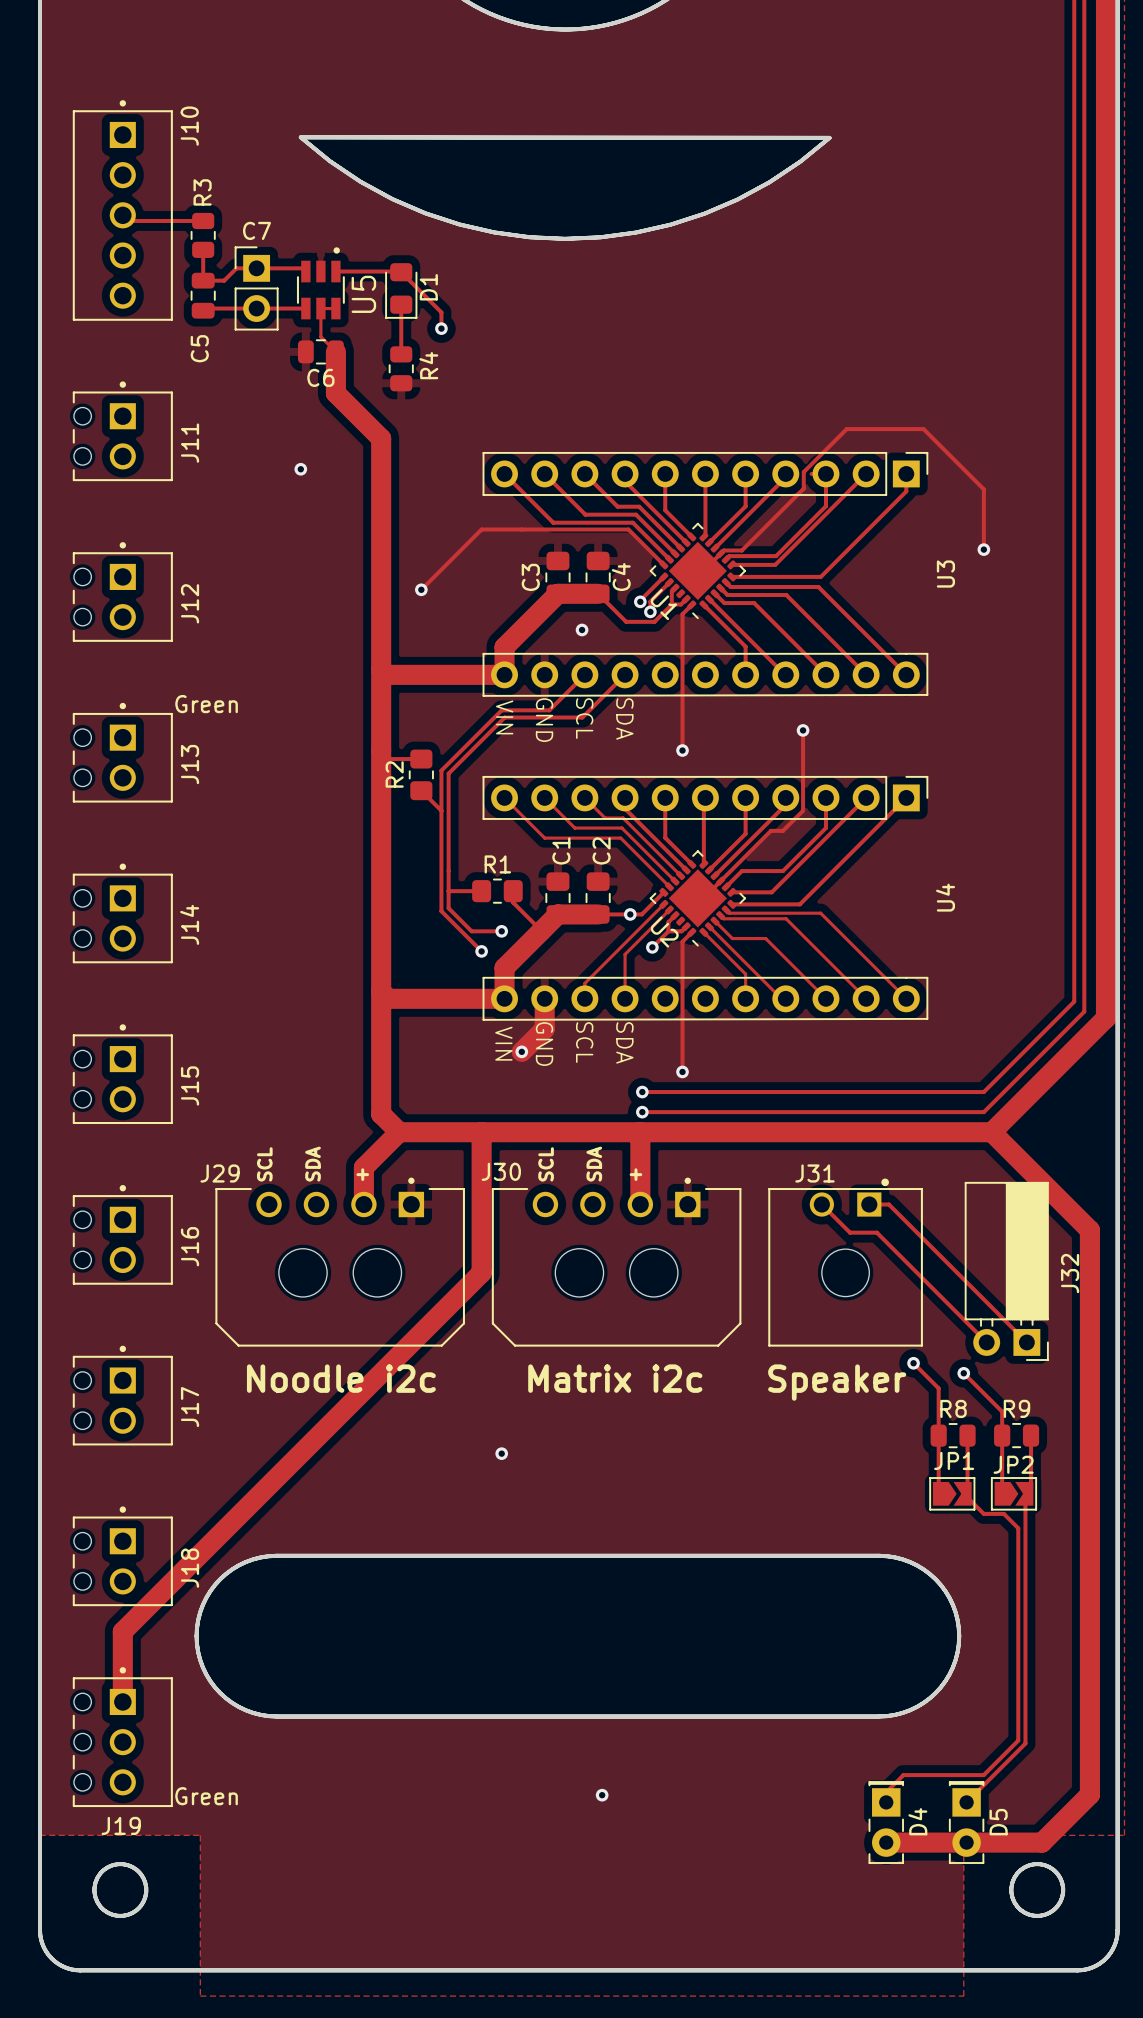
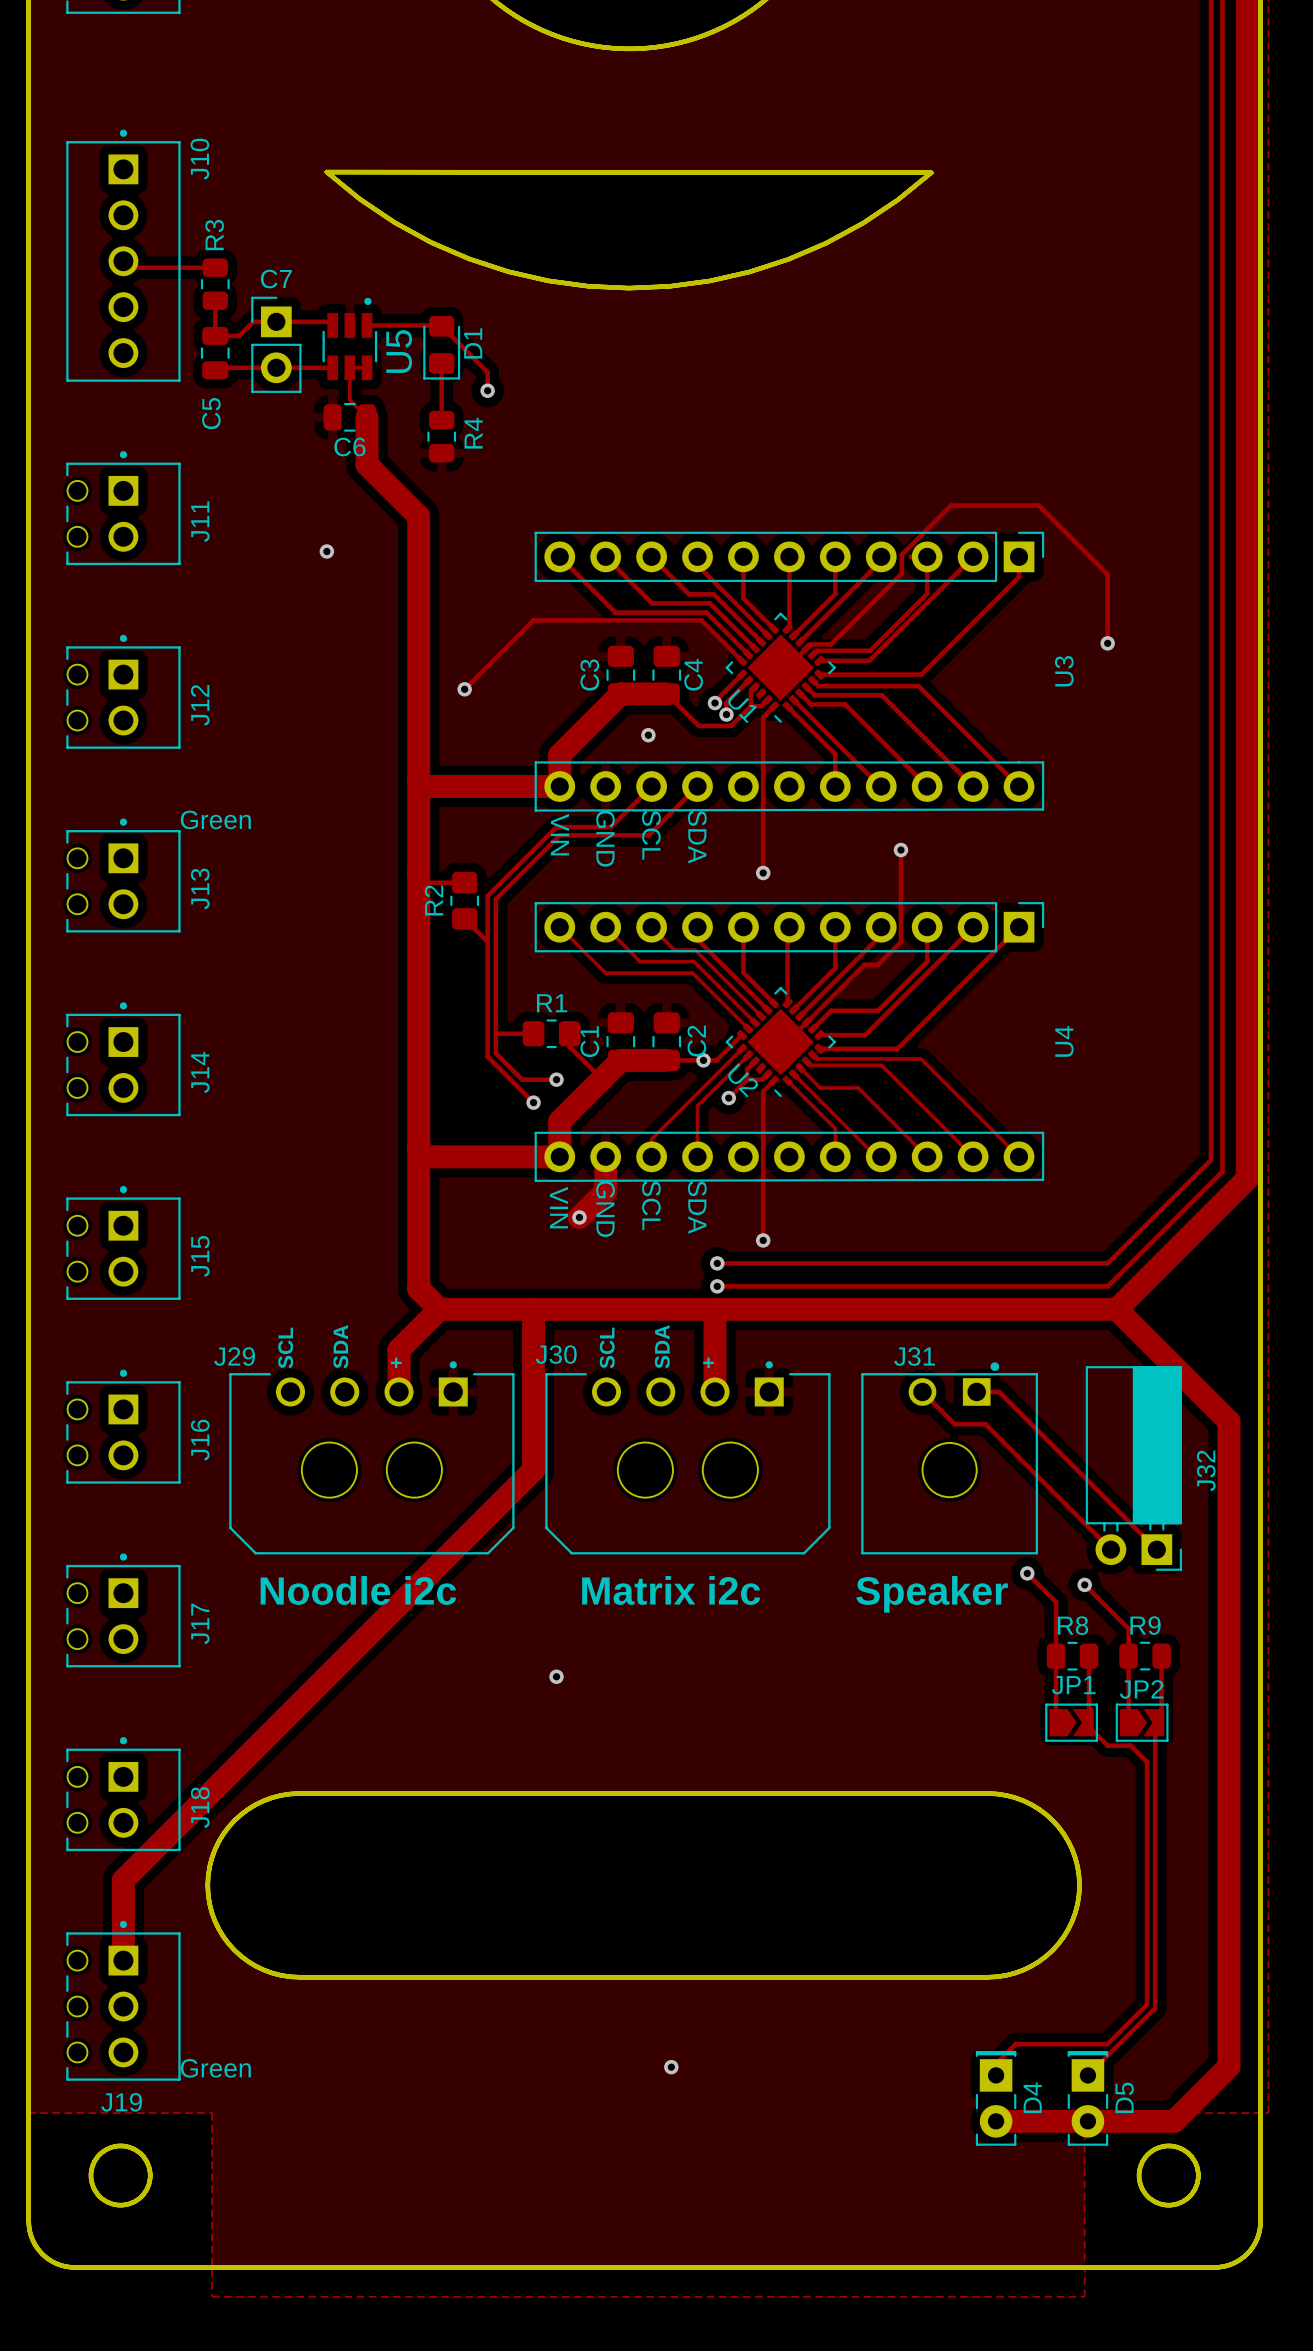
C1 name position: C1 (561, 850) -> C1 (589, 1041)
C2 name position: C2 (601, 850) -> C2 (696, 1041)

